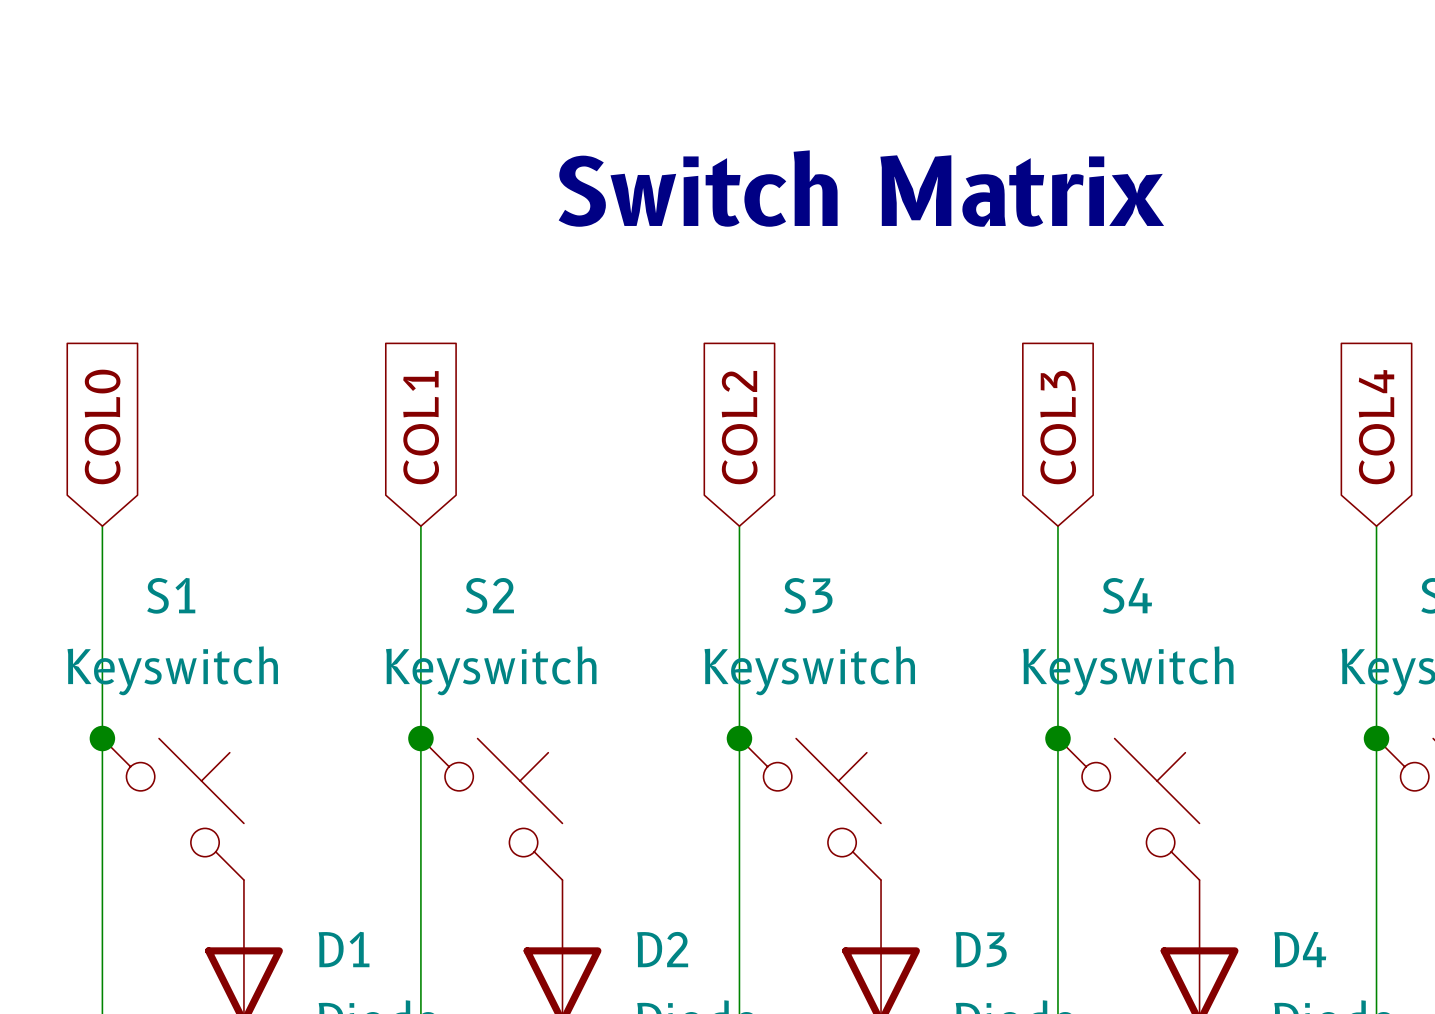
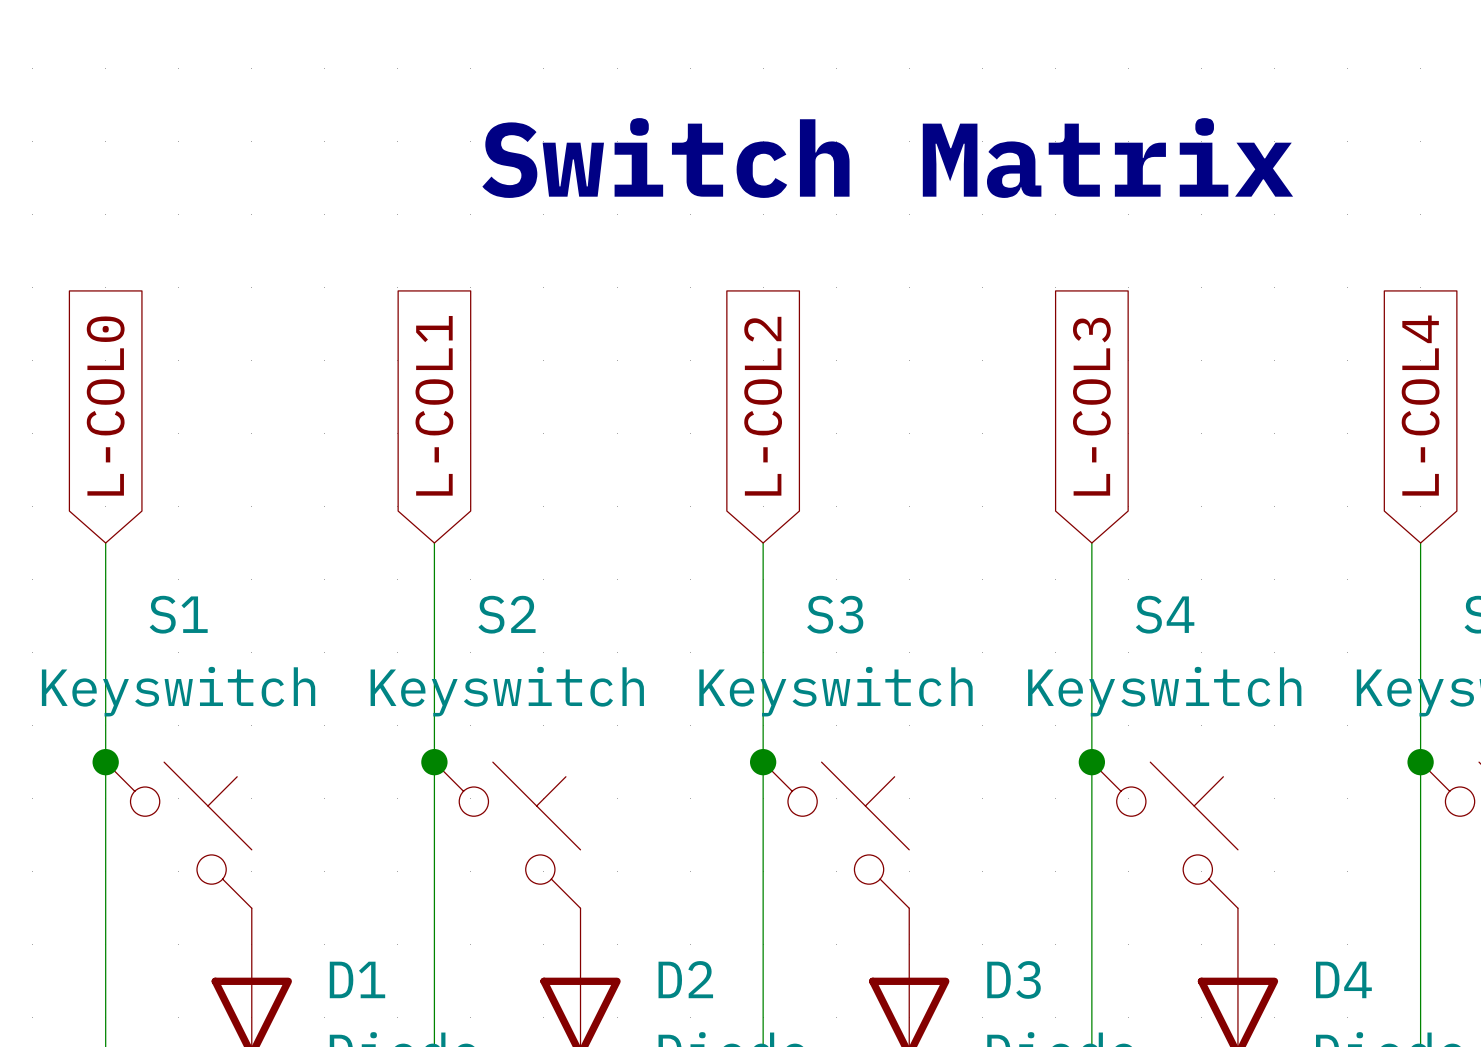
text position: Switch Matrix (861, 188) -> Switch Matrix (887, 158)
global label: COL0 (102, 426) -> L-COL0 (105, 406)
global label: COL1 (421, 427) -> L-COL1 (434, 405)
global label: COL2 (739, 427) -> L-COL2 (763, 406)
global label: COL3 (1058, 427) -> L-COL3 (1091, 406)
global label: COL4 (1376, 427) -> L-COL4 (1420, 405)

